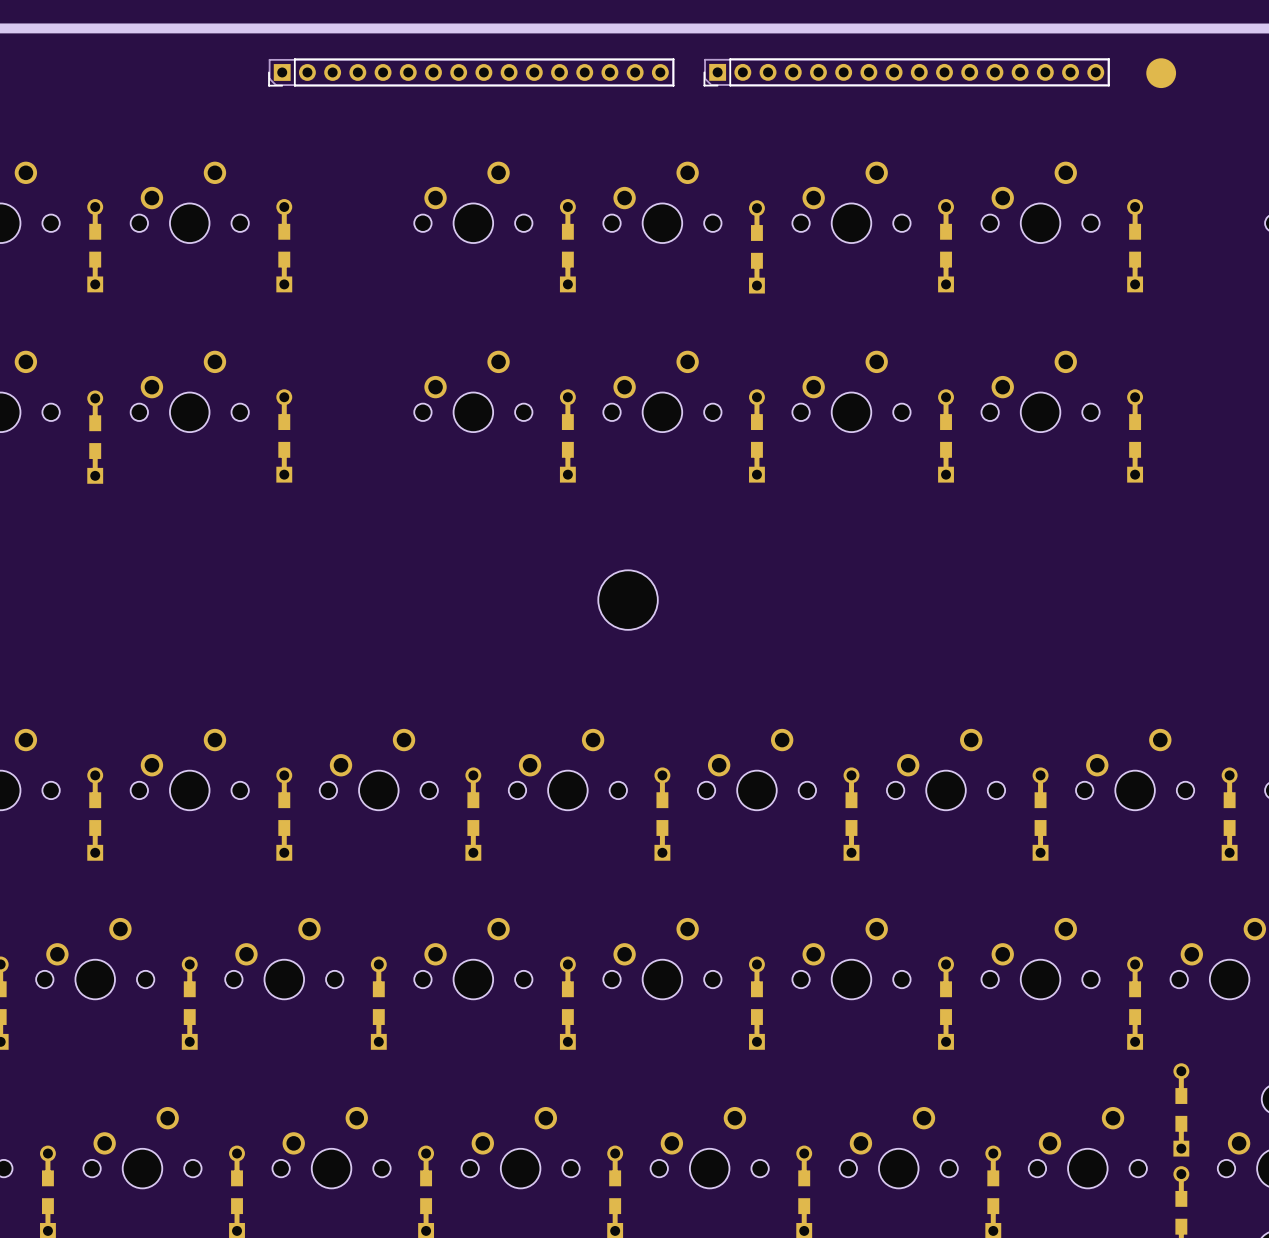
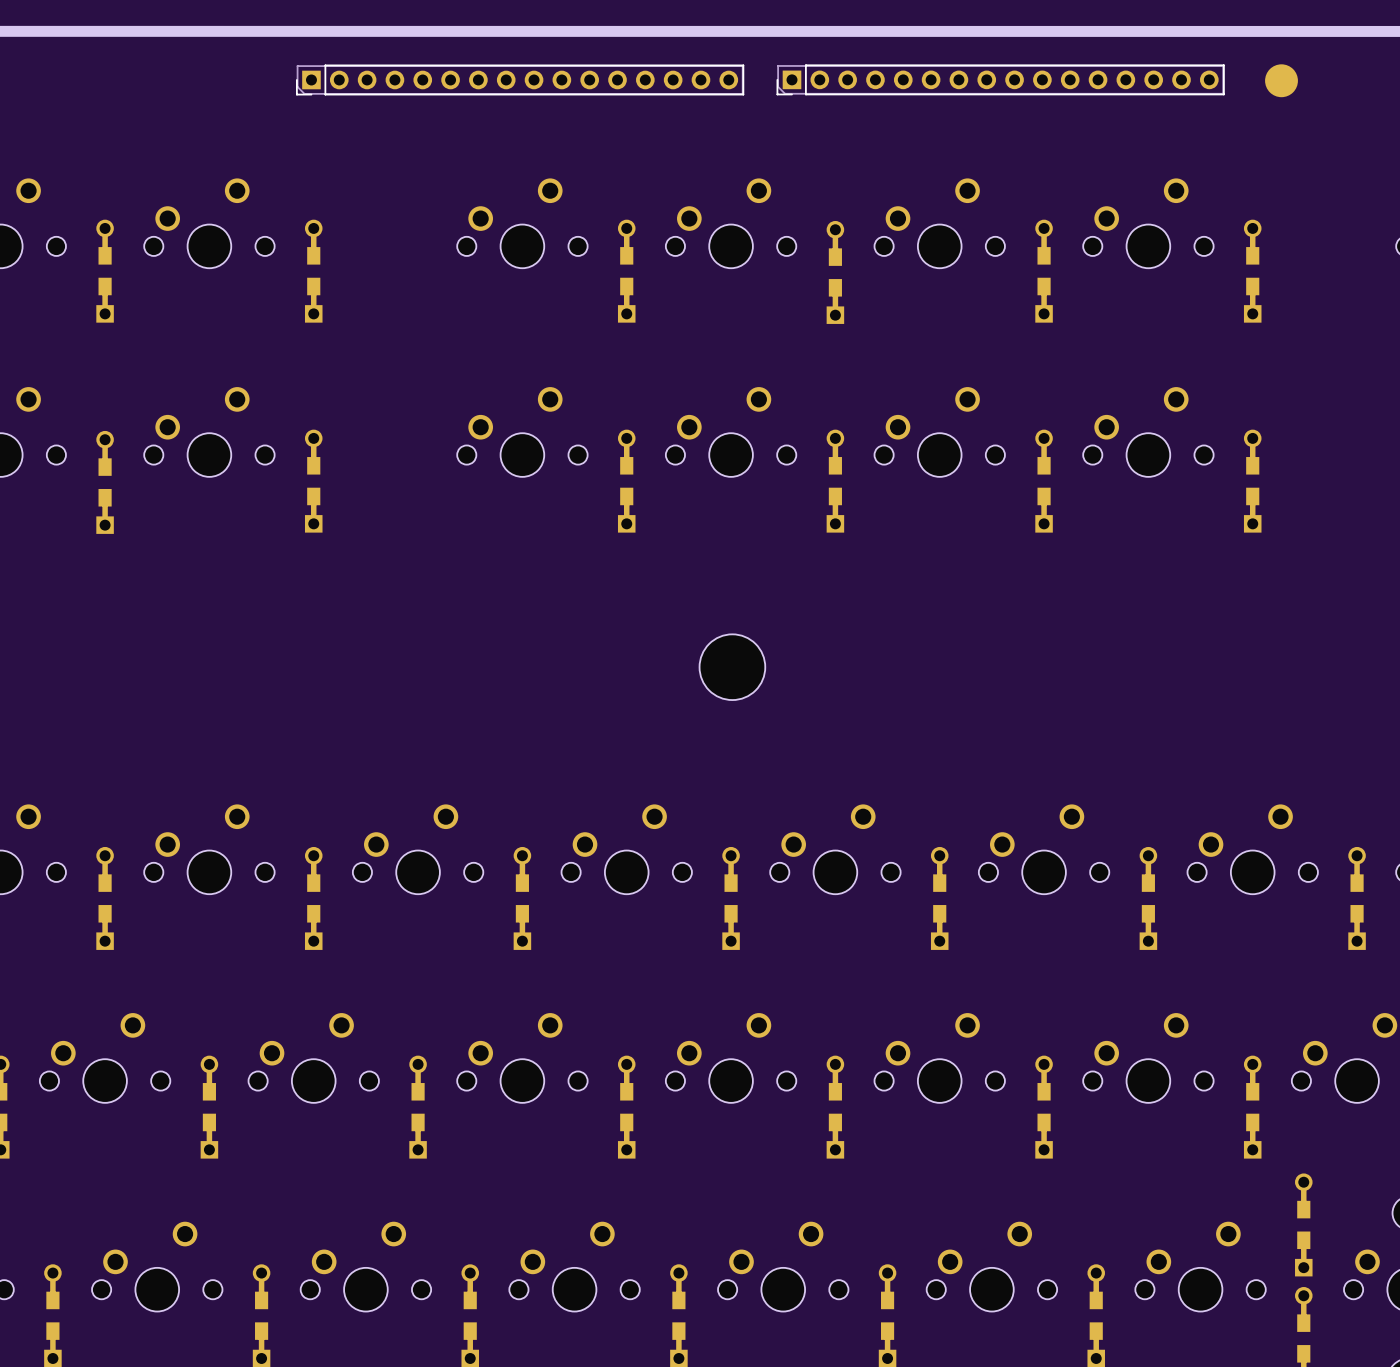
part position: (628, 600) -> (732, 667)

